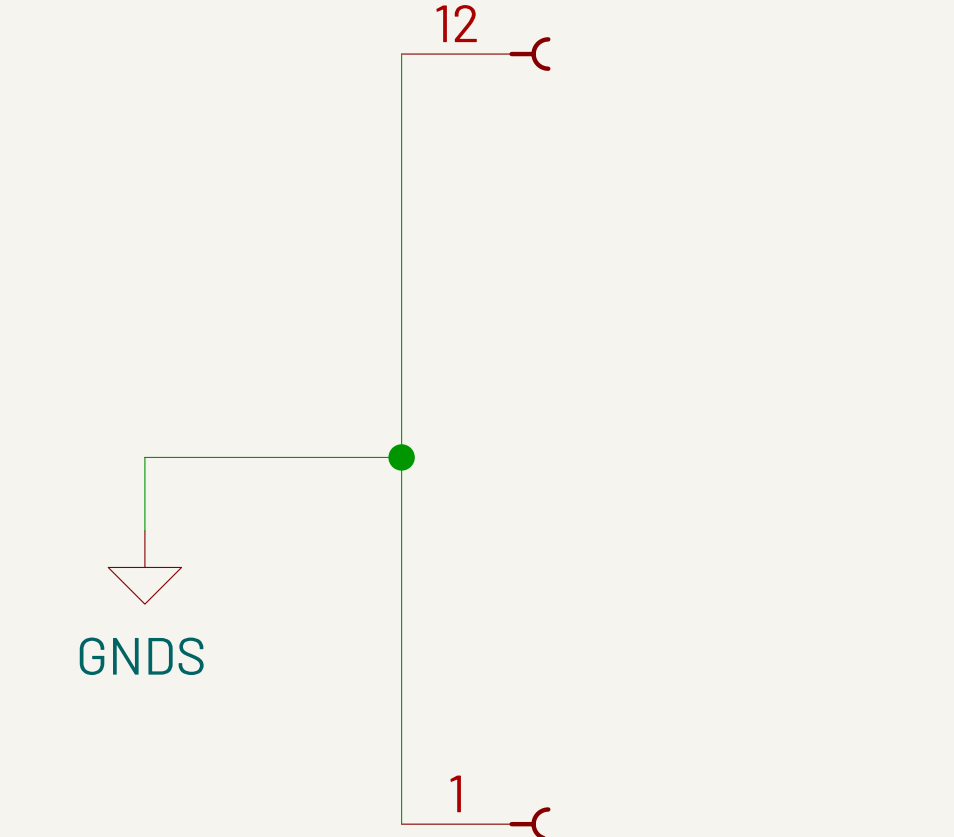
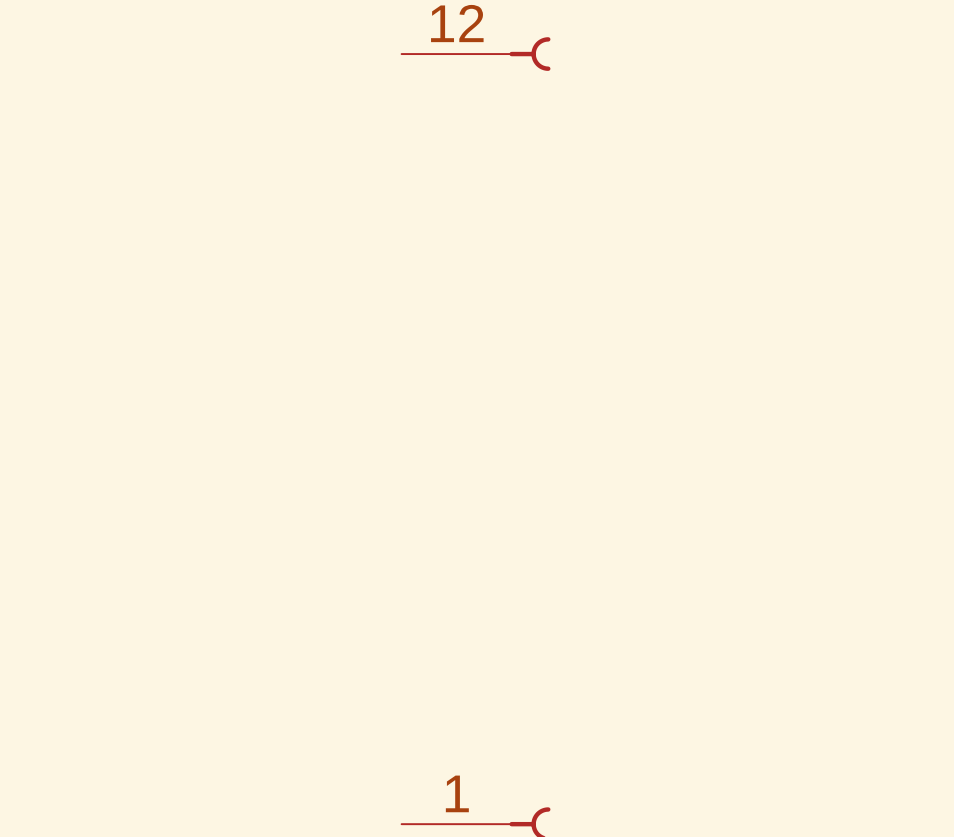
wire: (401, 54) (401, 824) -> none
wire: (401, 457) (144, 457) (144, 530) -> none
junction: (401, 457) -> none
power symbol: GNDS (144, 567) -> none

